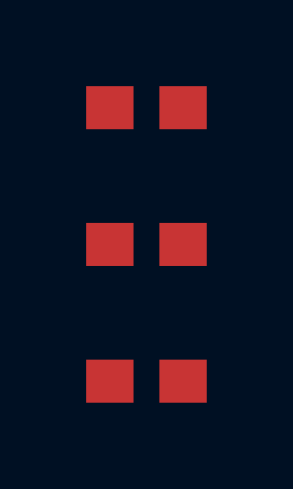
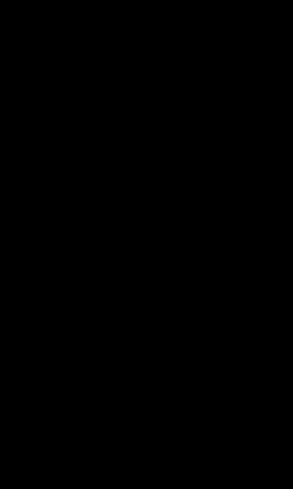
part: (146, 107) -> none
part: (146, 244) -> none
part: (146, 381) -> none

